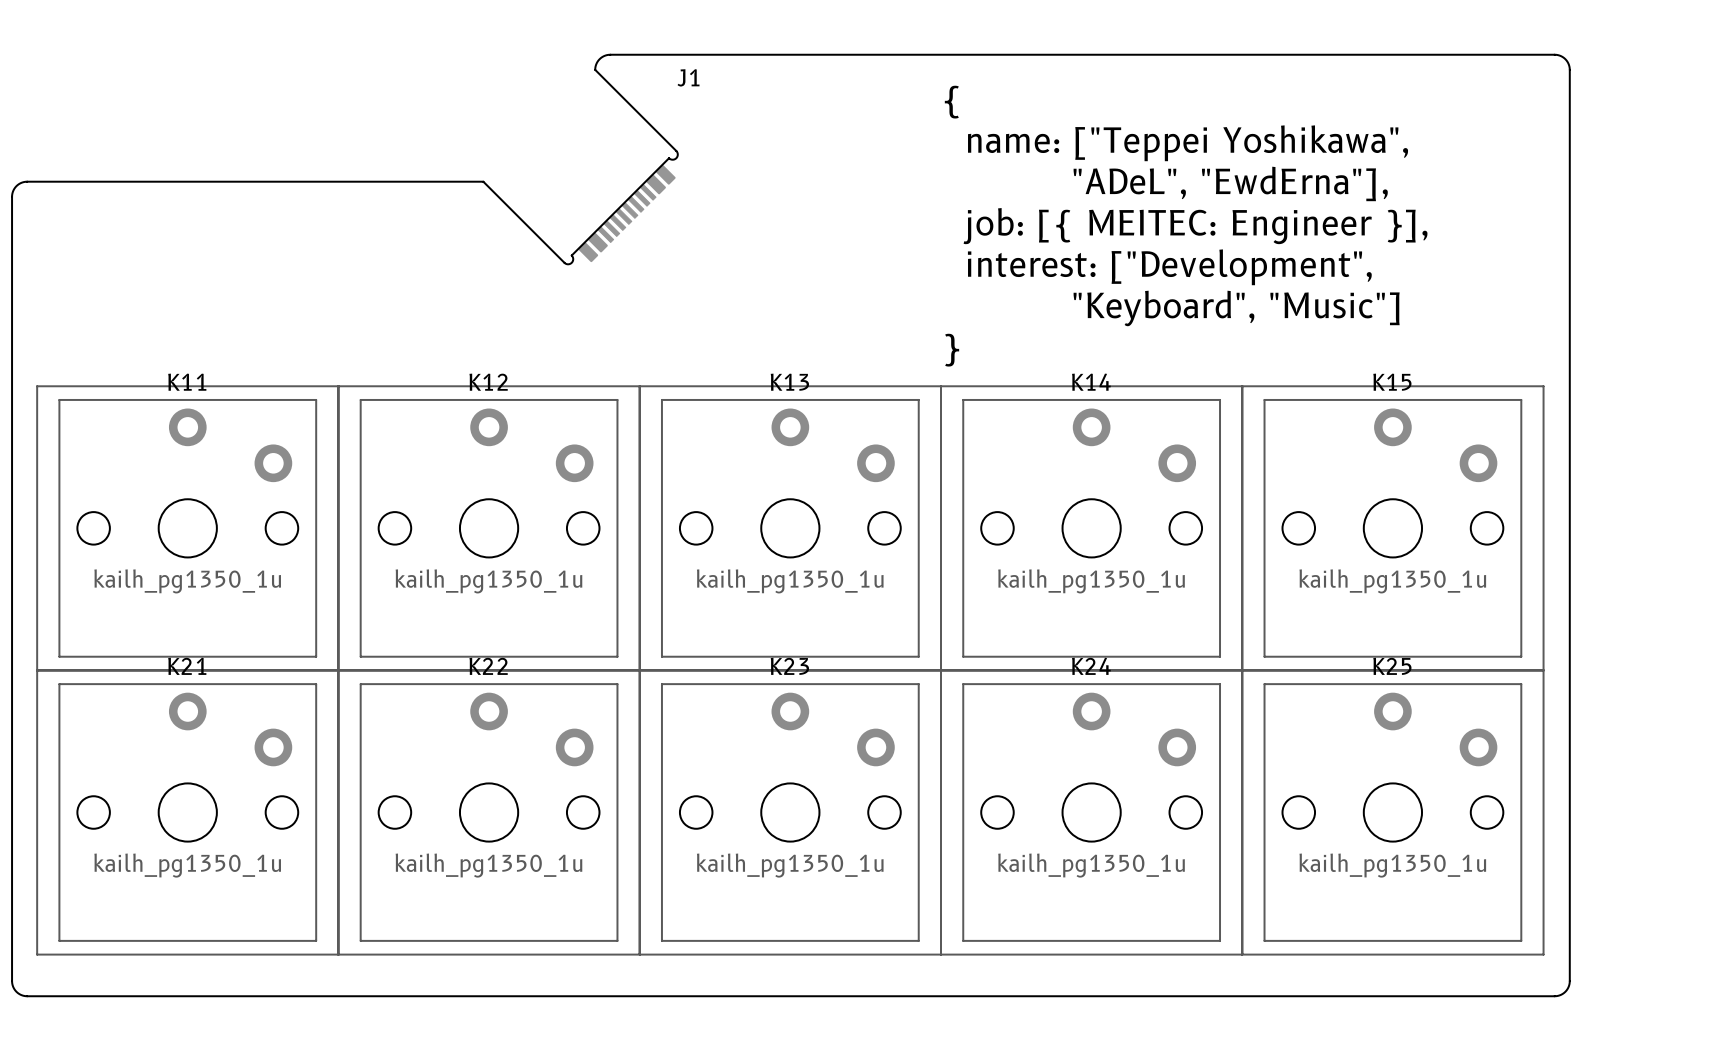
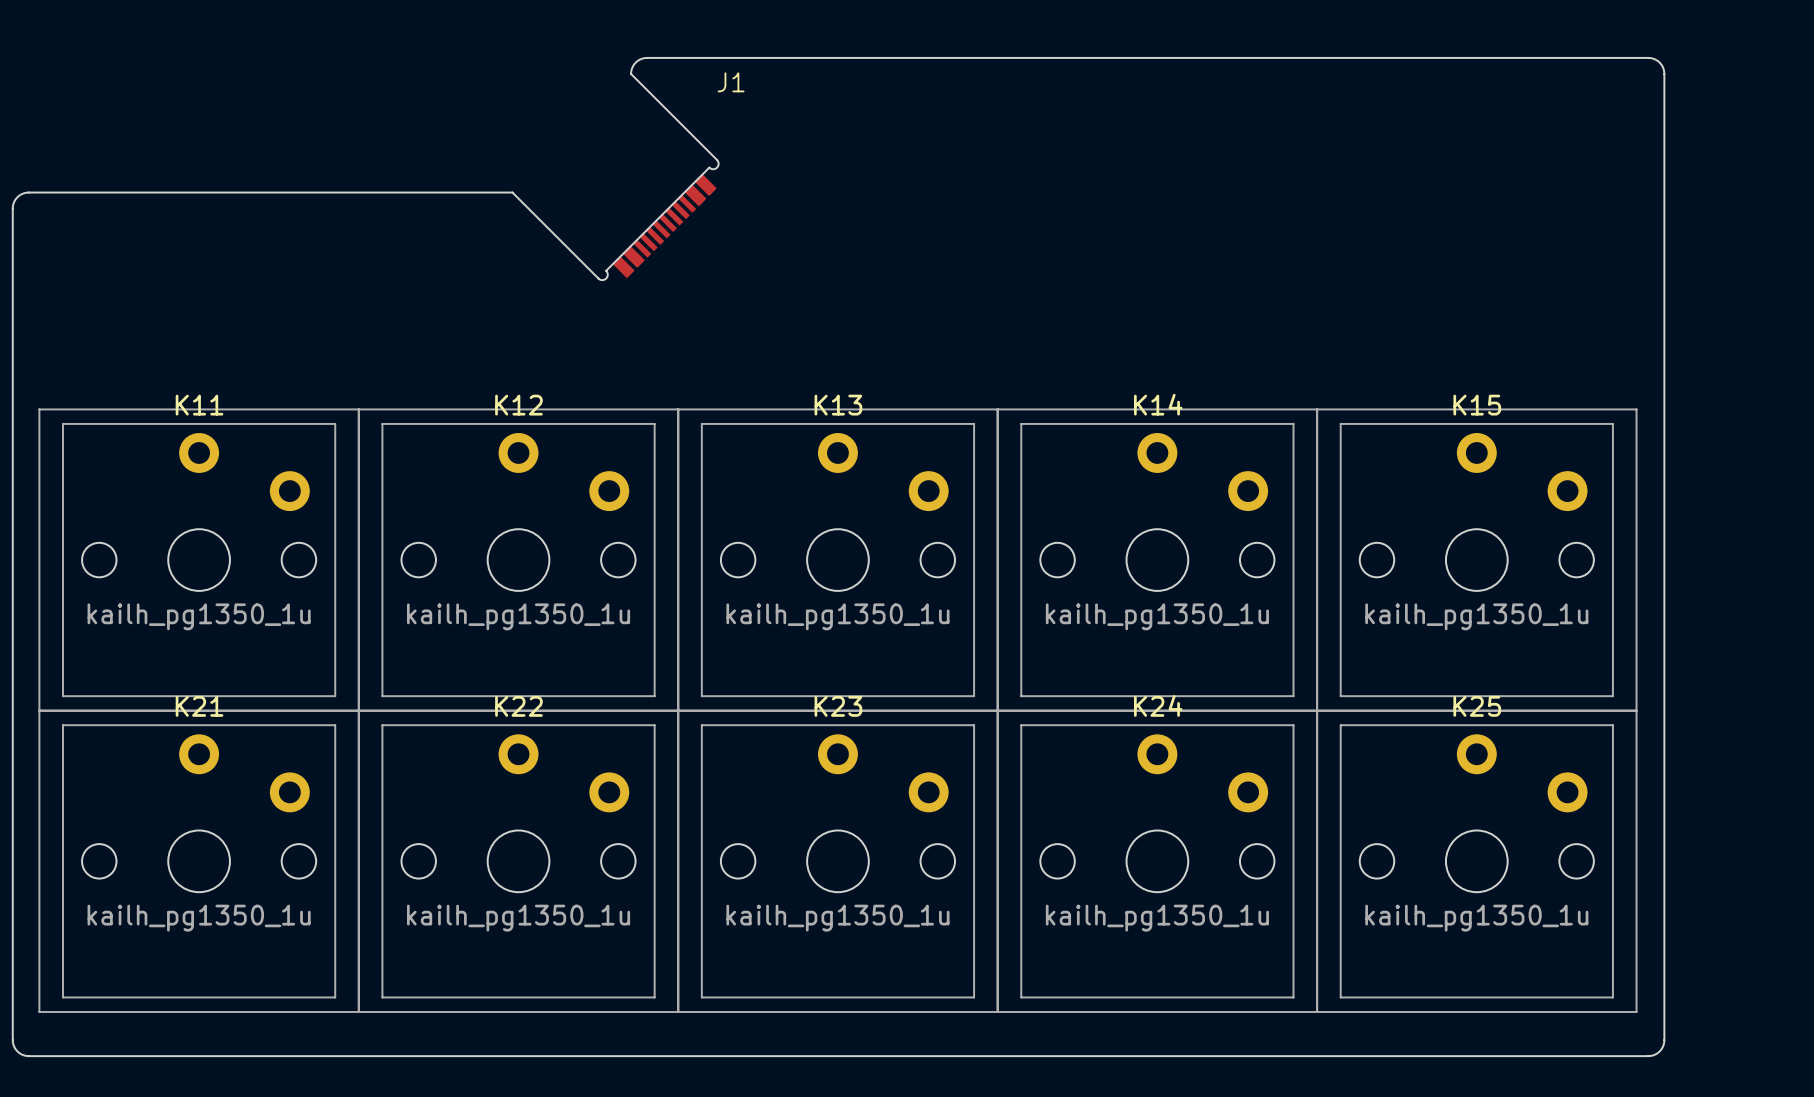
text: { (951, 102) -> none
text: name: ["Teppei Yoshikawa", (1188, 143) -> none
text: "ADeL", "EwdErna"], (1230, 183) -> none
text: job: [{ MEITEC: Engineer }], (1195, 226) -> none
text: interest: ["Development", (1169, 267) -> none
text: "Keyboard", "Music"] (1236, 308) -> none
text: } (952, 350) -> none

